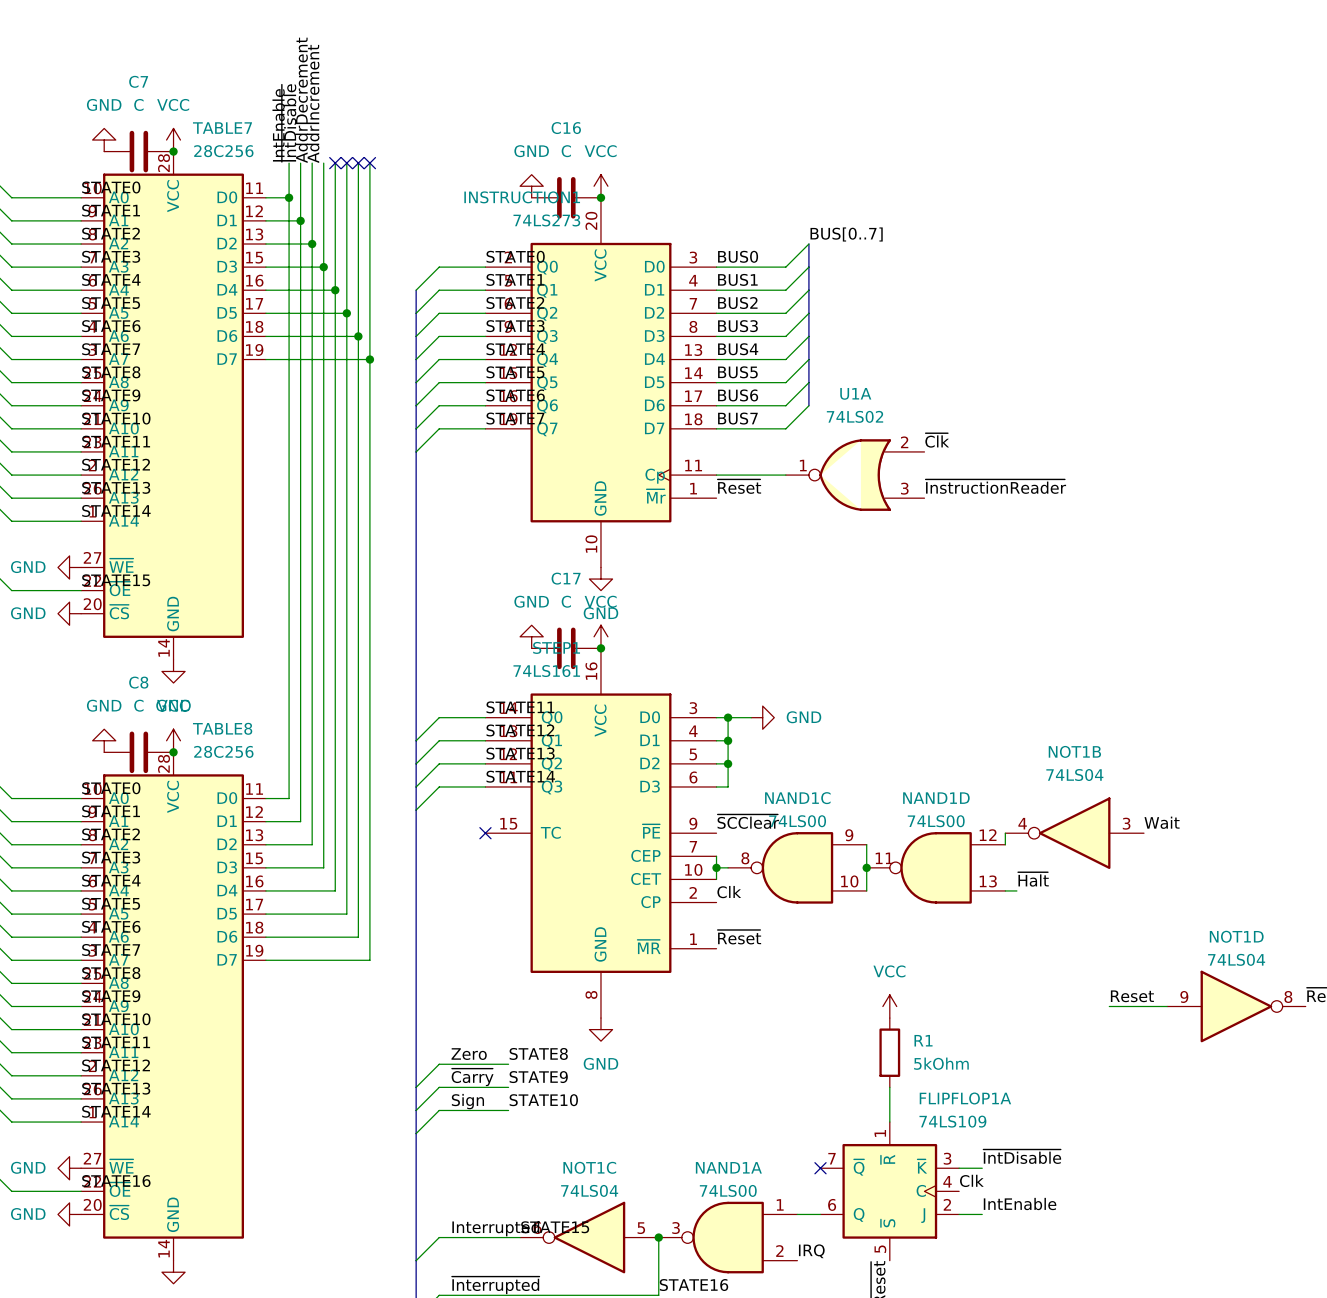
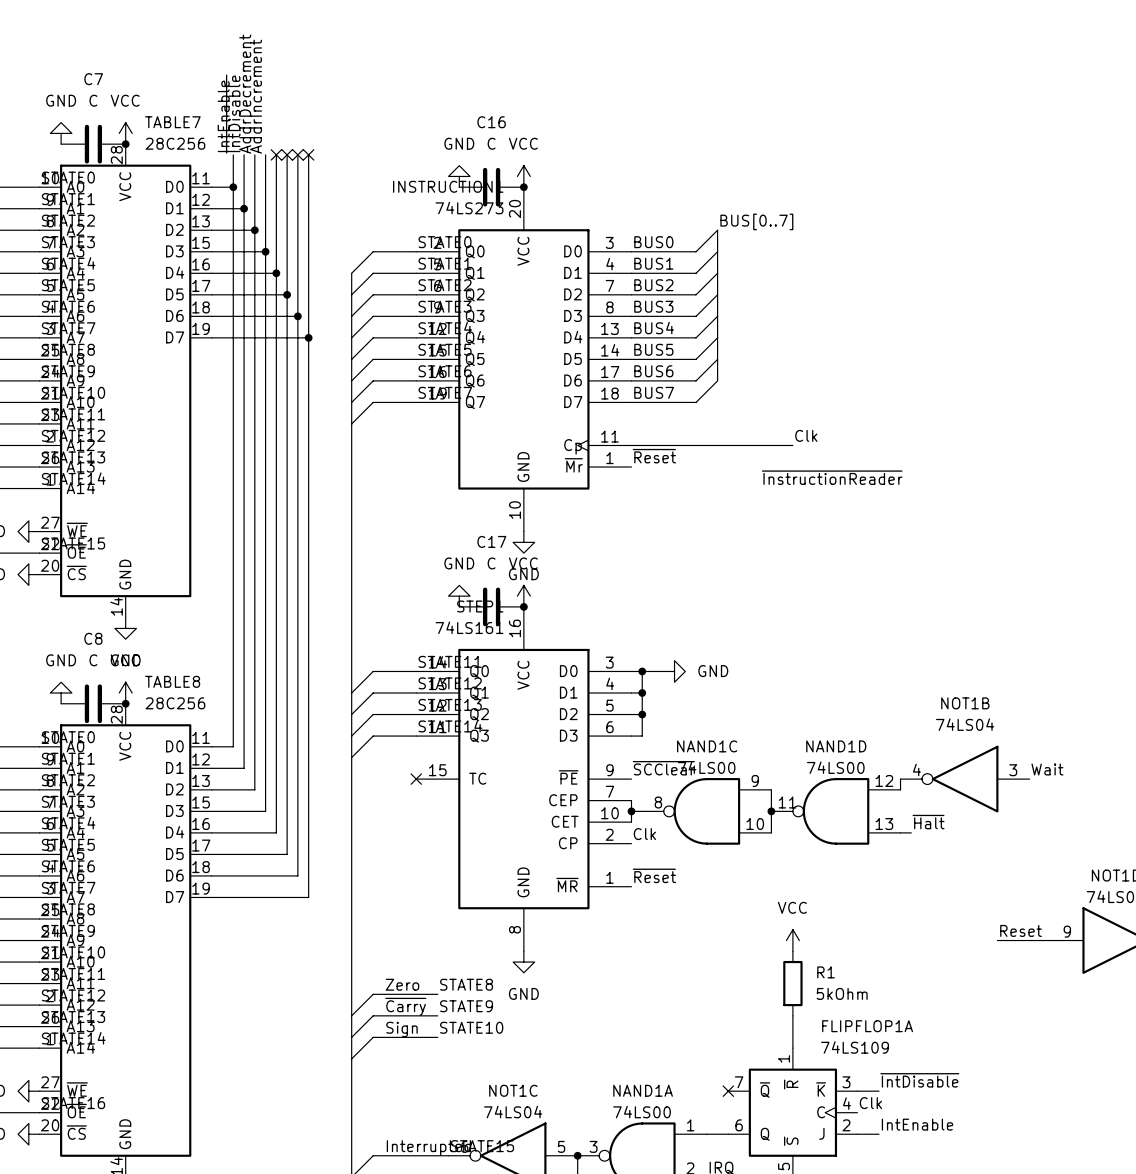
label: ~{Clk} (937, 440) -> Clk (806, 435)
wire: none -> (696, 445) (792, 445)
U1A: 74LS02 (855, 475) -> none
label position: ~{InstructionReader} (995, 486) -> ~{InstructionReader} (832, 477)

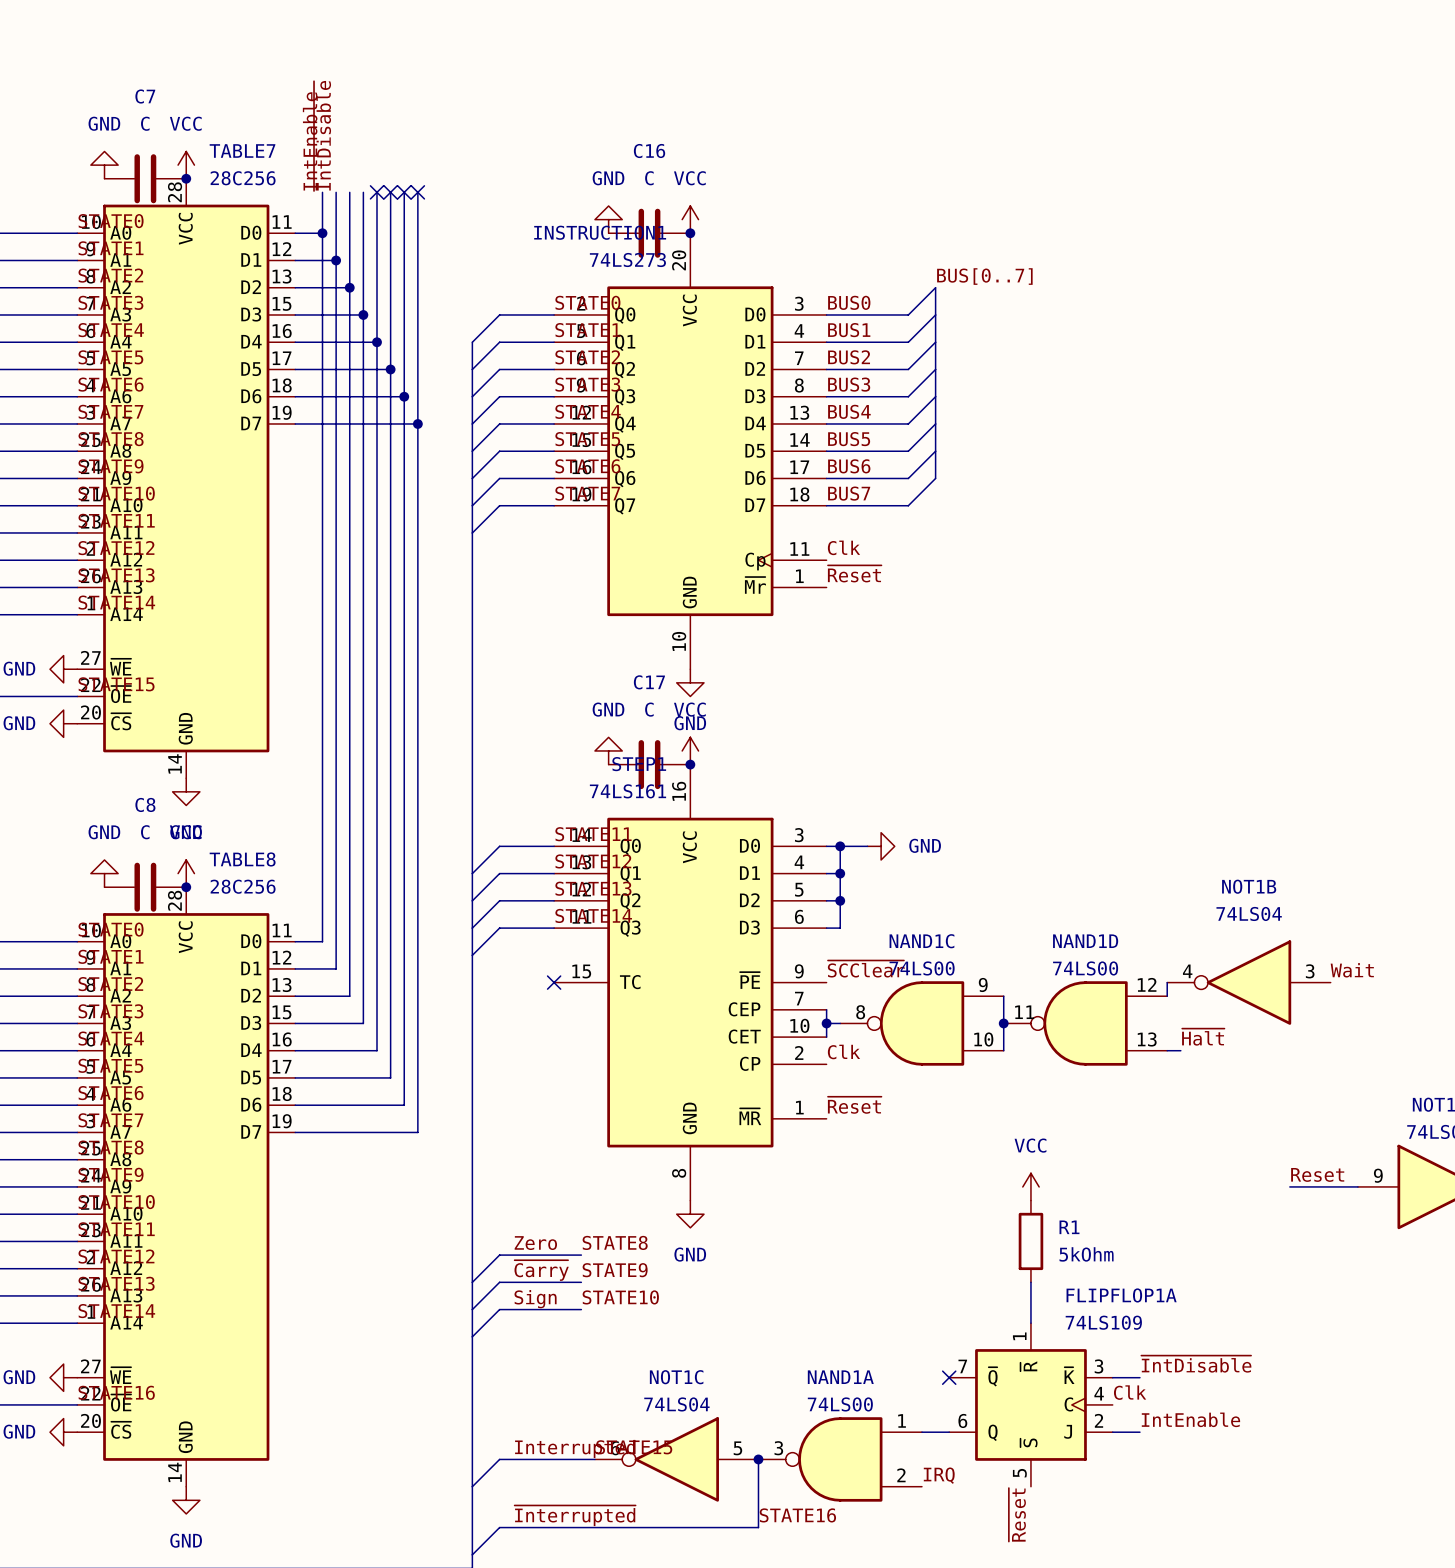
label: AddrDecrement (245, 94) -> none
label: AddrIncrement (255, 96) -> none
label position: Clk (806, 435) -> Clk (843, 547)
wire: (631, 445) (792, 445) -> none
label: ~{InstructionReader} (832, 477) -> none

